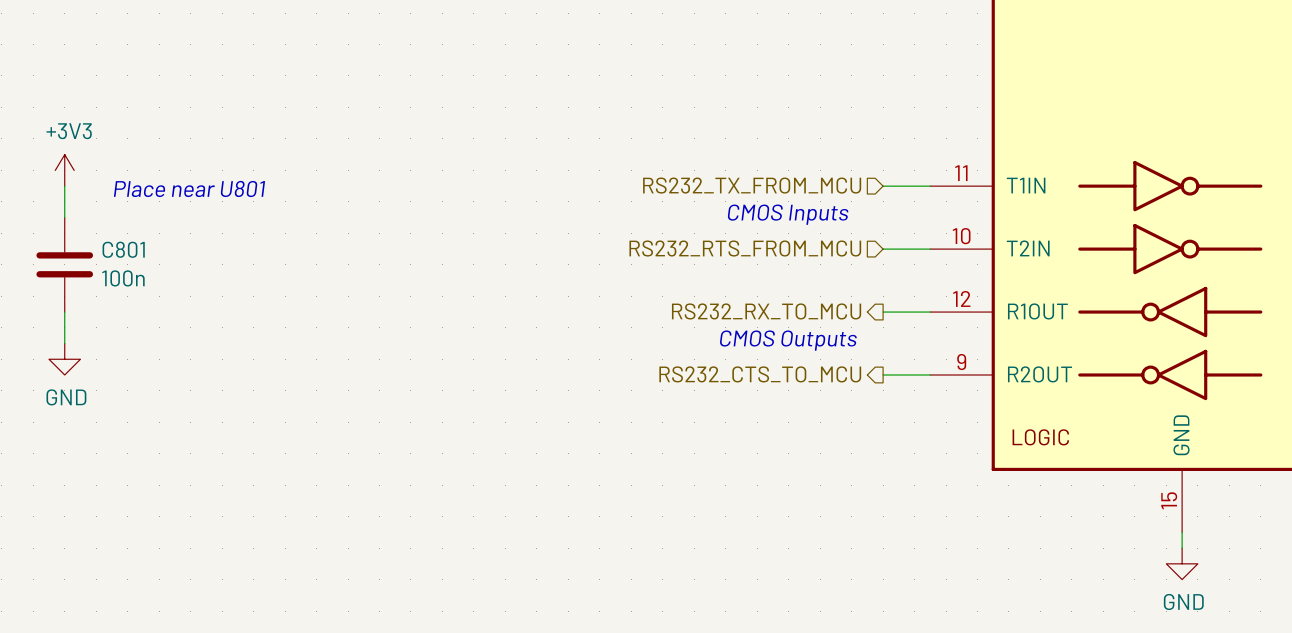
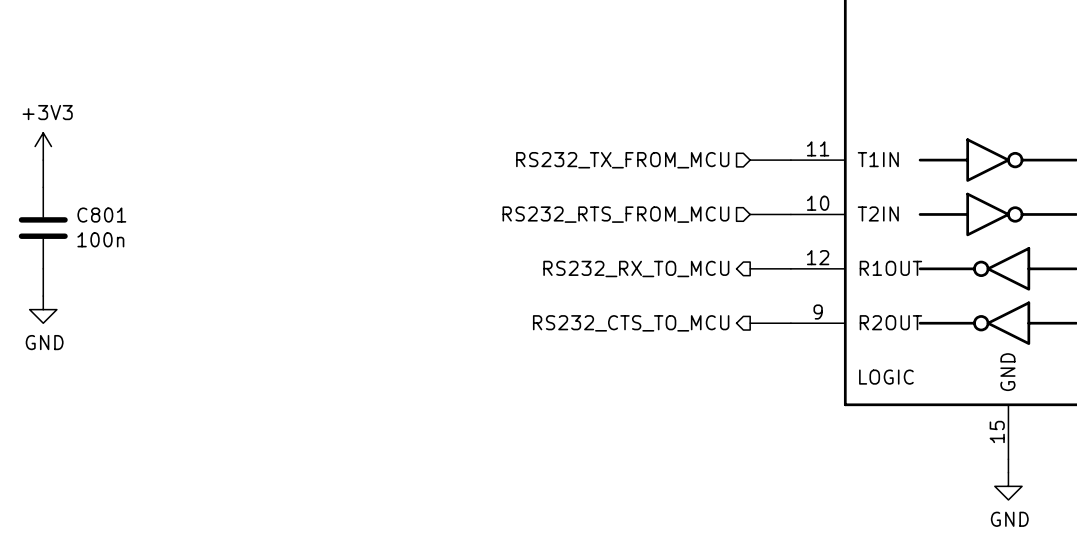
text: Place near U801 (189, 188) -> none
text: CMOS Inputs (788, 214) -> none
text: CMOS Outputs (788, 340) -> none

